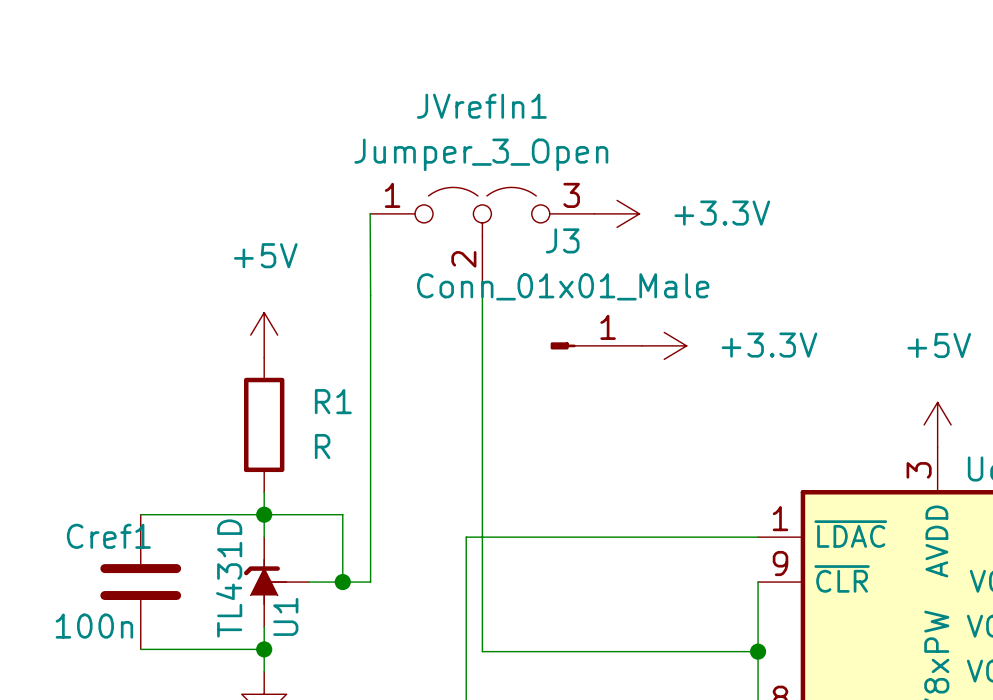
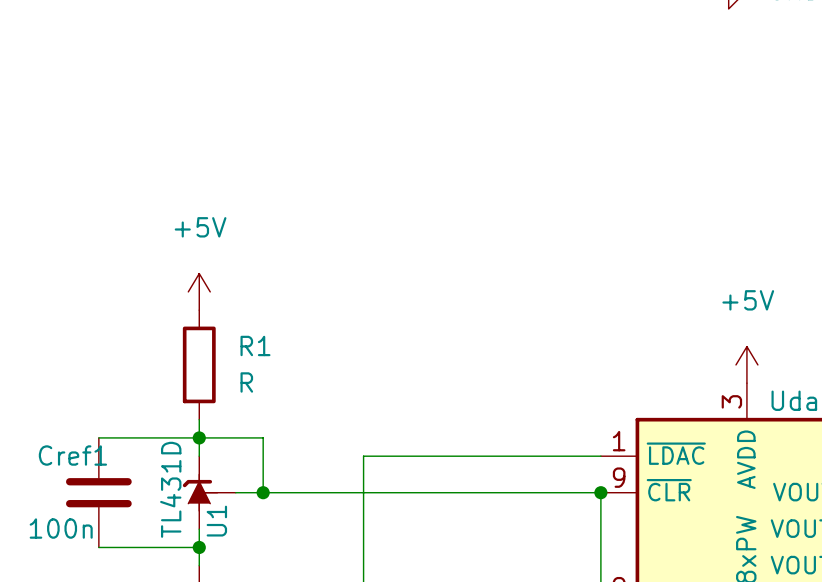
wire: (370, 213) (370, 582) -> (600, 492) (285, 492)
power symbol: +3.3V (617, 213) -> none
JVrefIn1: Jumper_3_Open (482, 234) -> none
wire: (482, 281) (482, 651) (758, 651) -> none
J3: Conn_01x01_Male (596, 345) -> none
power symbol: +3.3V (664, 345) -> none
junction position: (758, 651) -> (600, 492)

